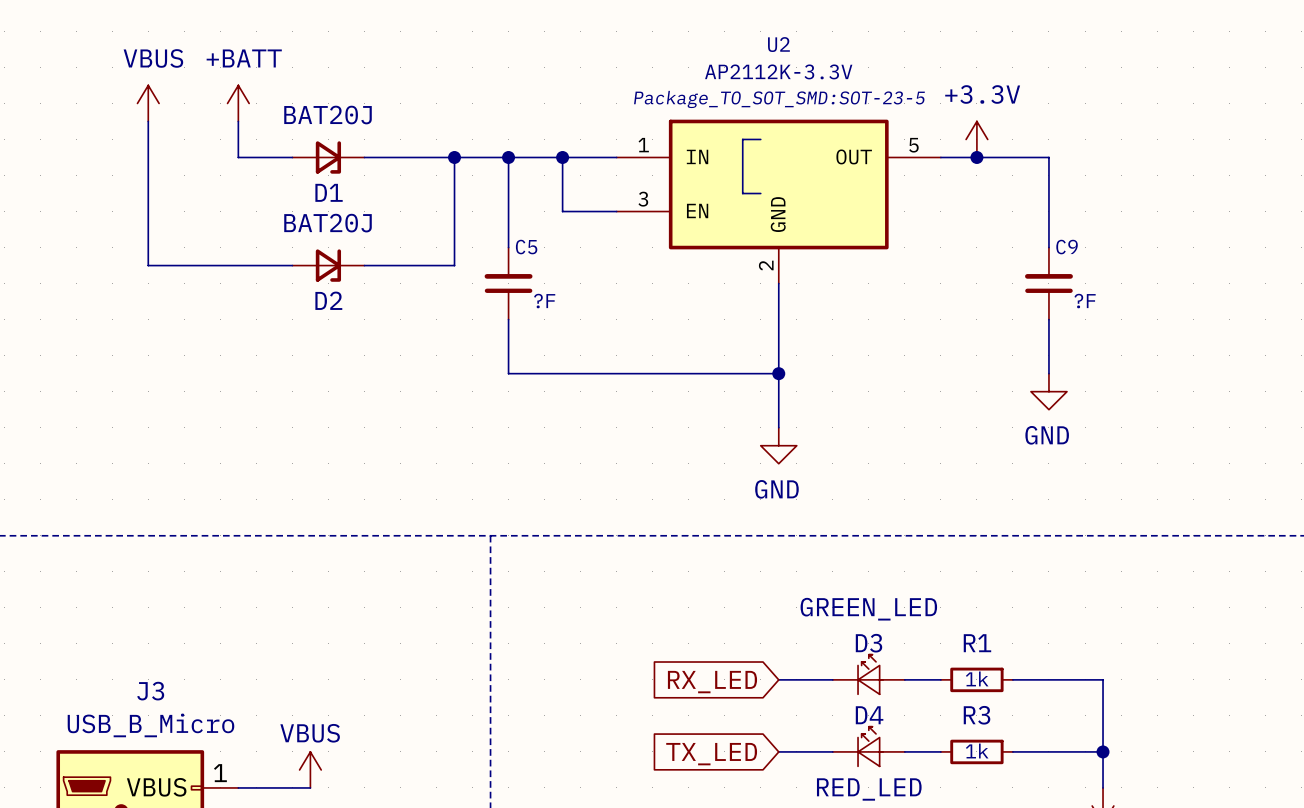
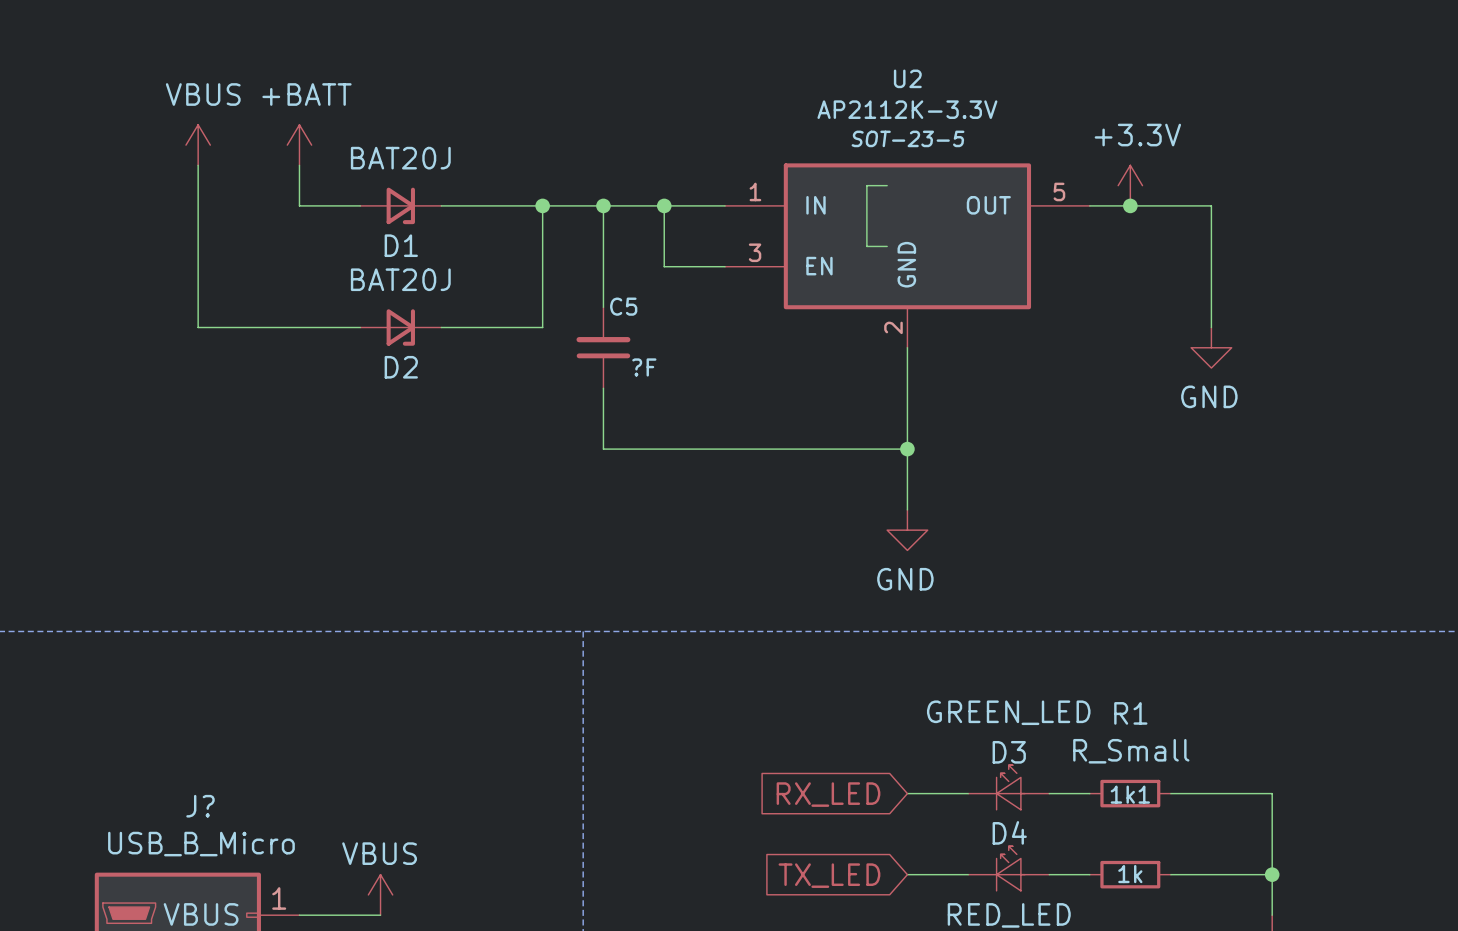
U2 text: Package_TO_SOT_SMD:SOT-23-5 (779, 99) -> SOT-23-5 (908, 138)
C9: ?F (1048, 283) -> none
wire: (1048, 319) (1048, 373) -> none
power symbol position: GND (1048, 391) -> GND (1211, 347)
R1 name position: R1 (977, 643) -> R1 (1130, 713)
R1 value: 1k (977, 678) -> R_Small (1131, 751)
J3 name: J3 (150, 691) -> J? (200, 806)
R3 name: R3 (977, 715) -> 1k1 (1130, 794)

